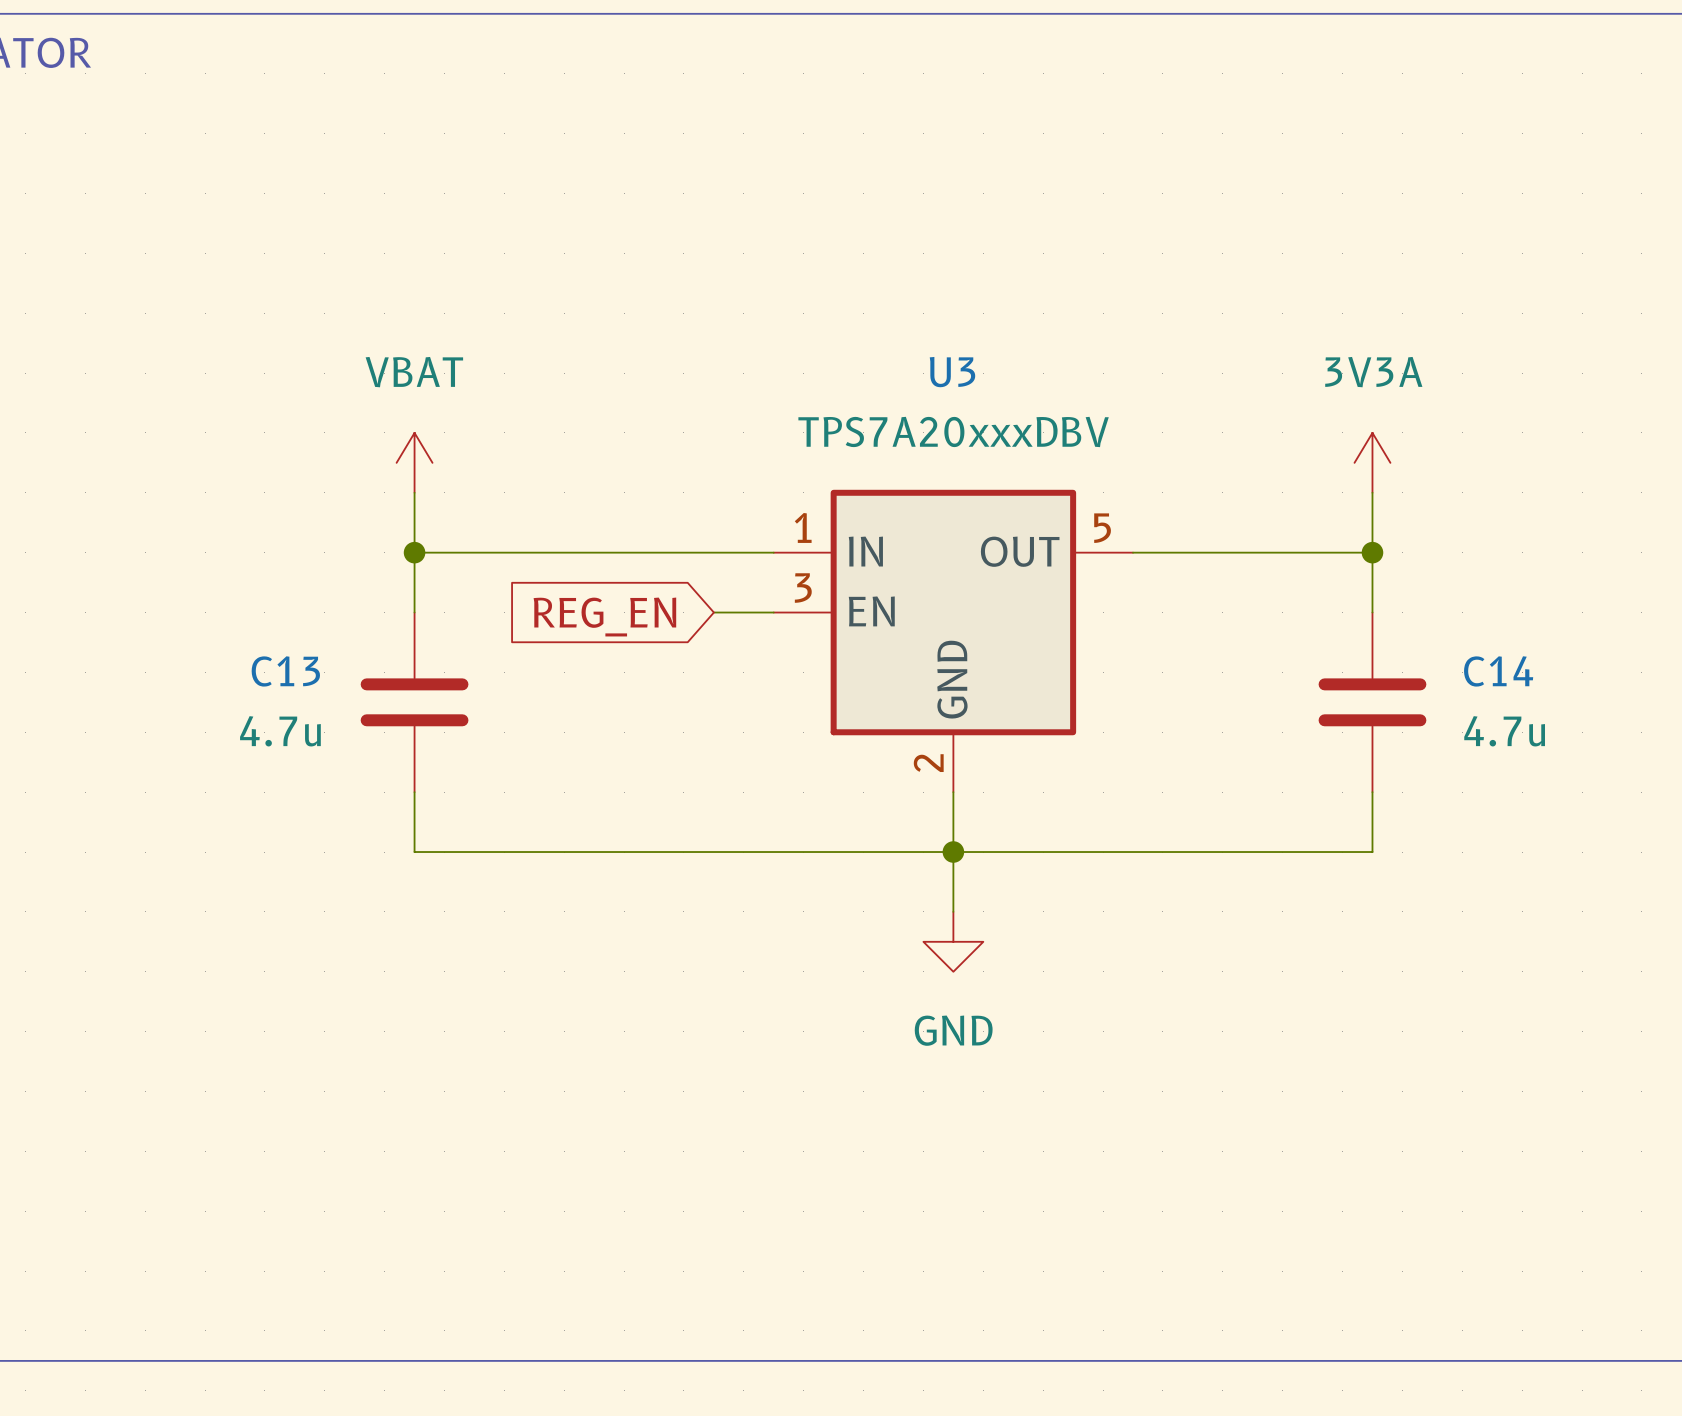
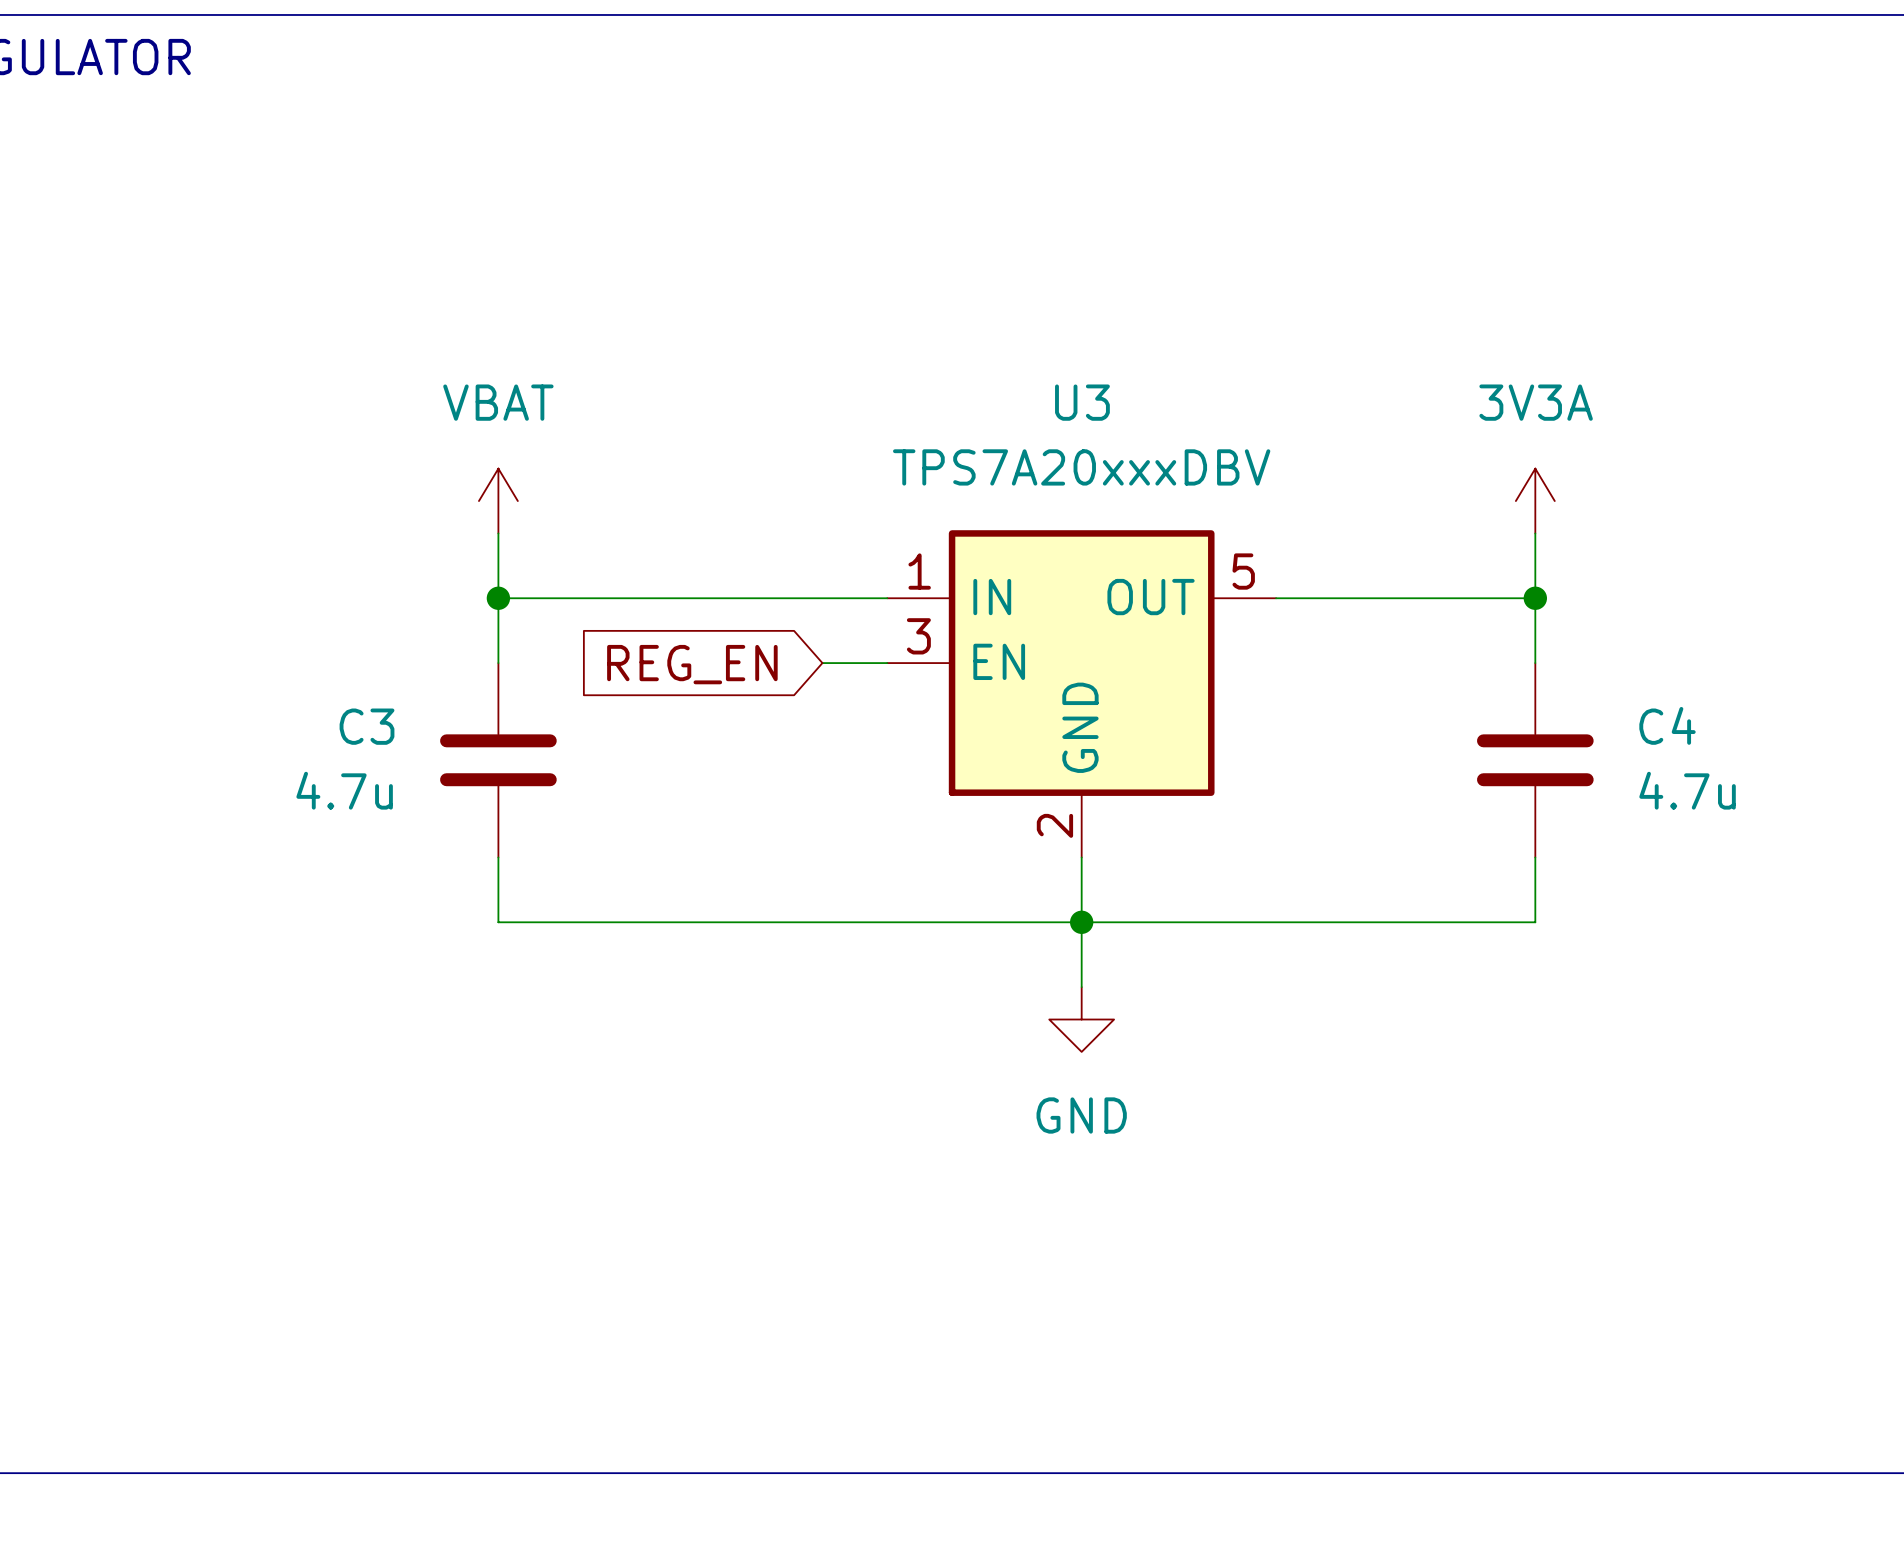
C13 name: C13 (285, 671) -> C3 (367, 726)
C14 name: C14 (1498, 671) -> C4 (1667, 725)

